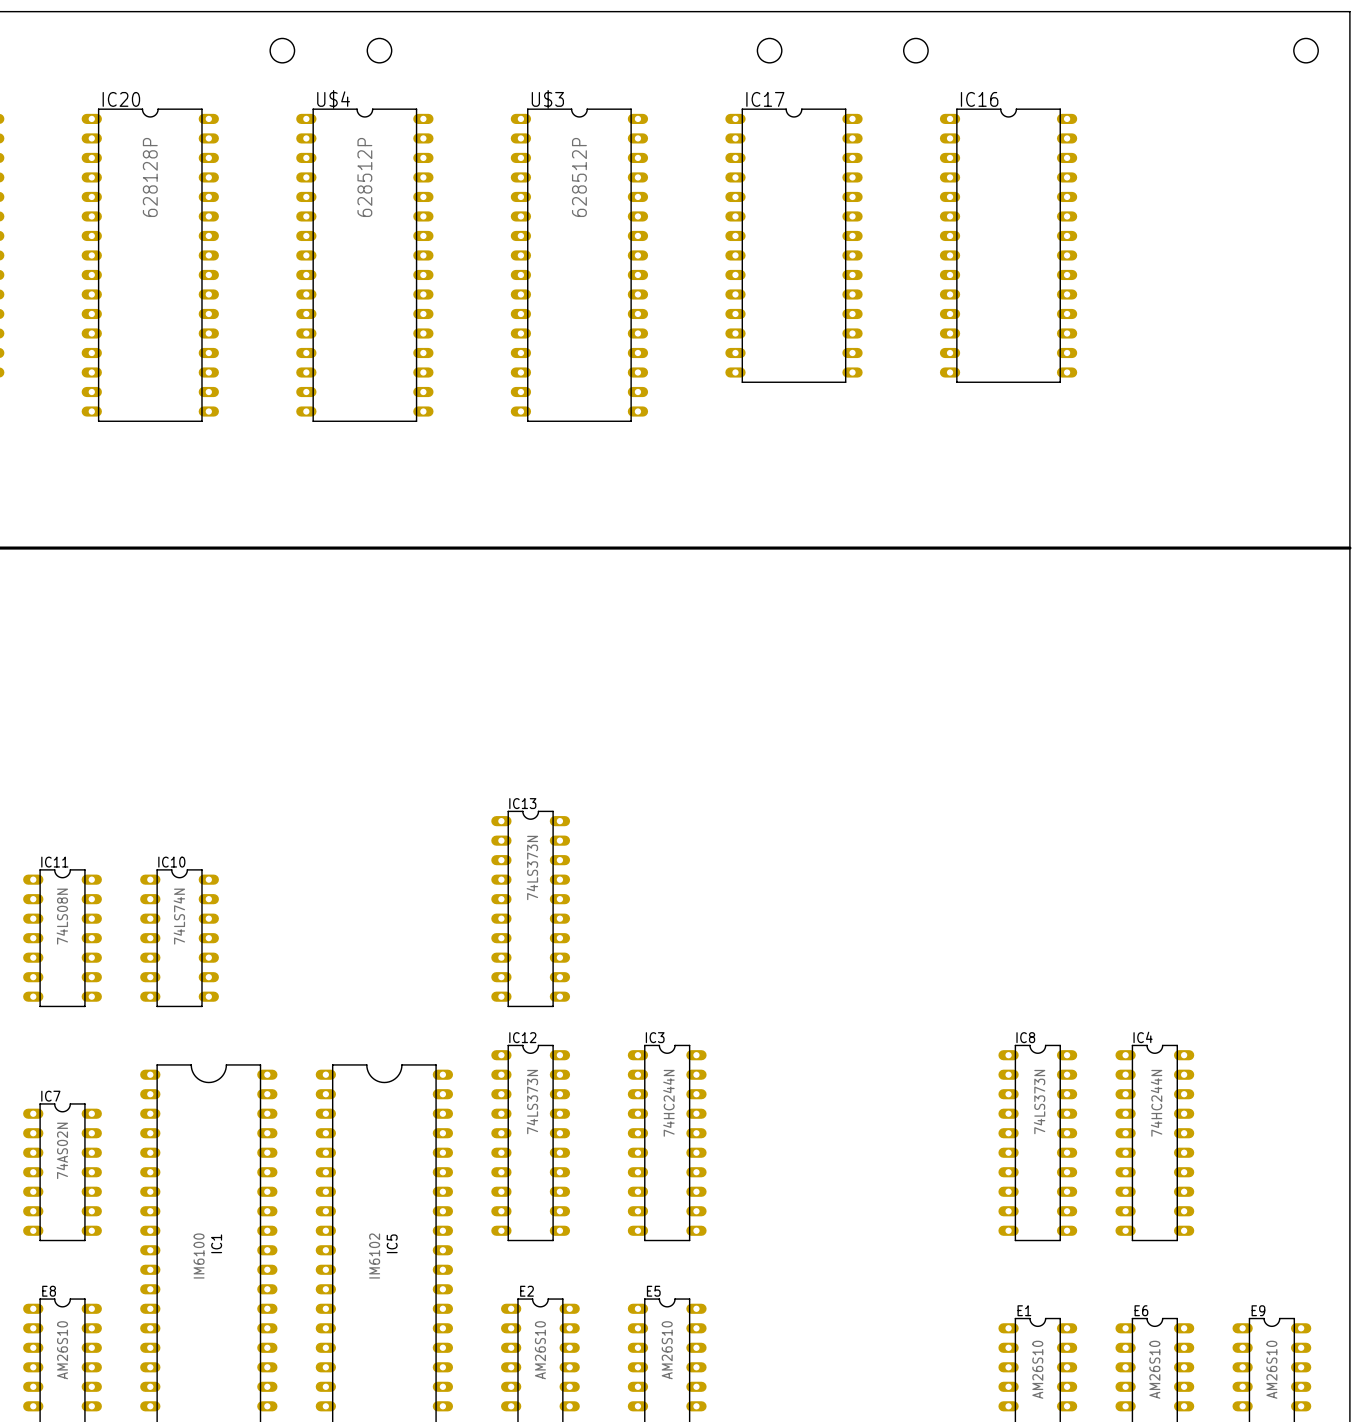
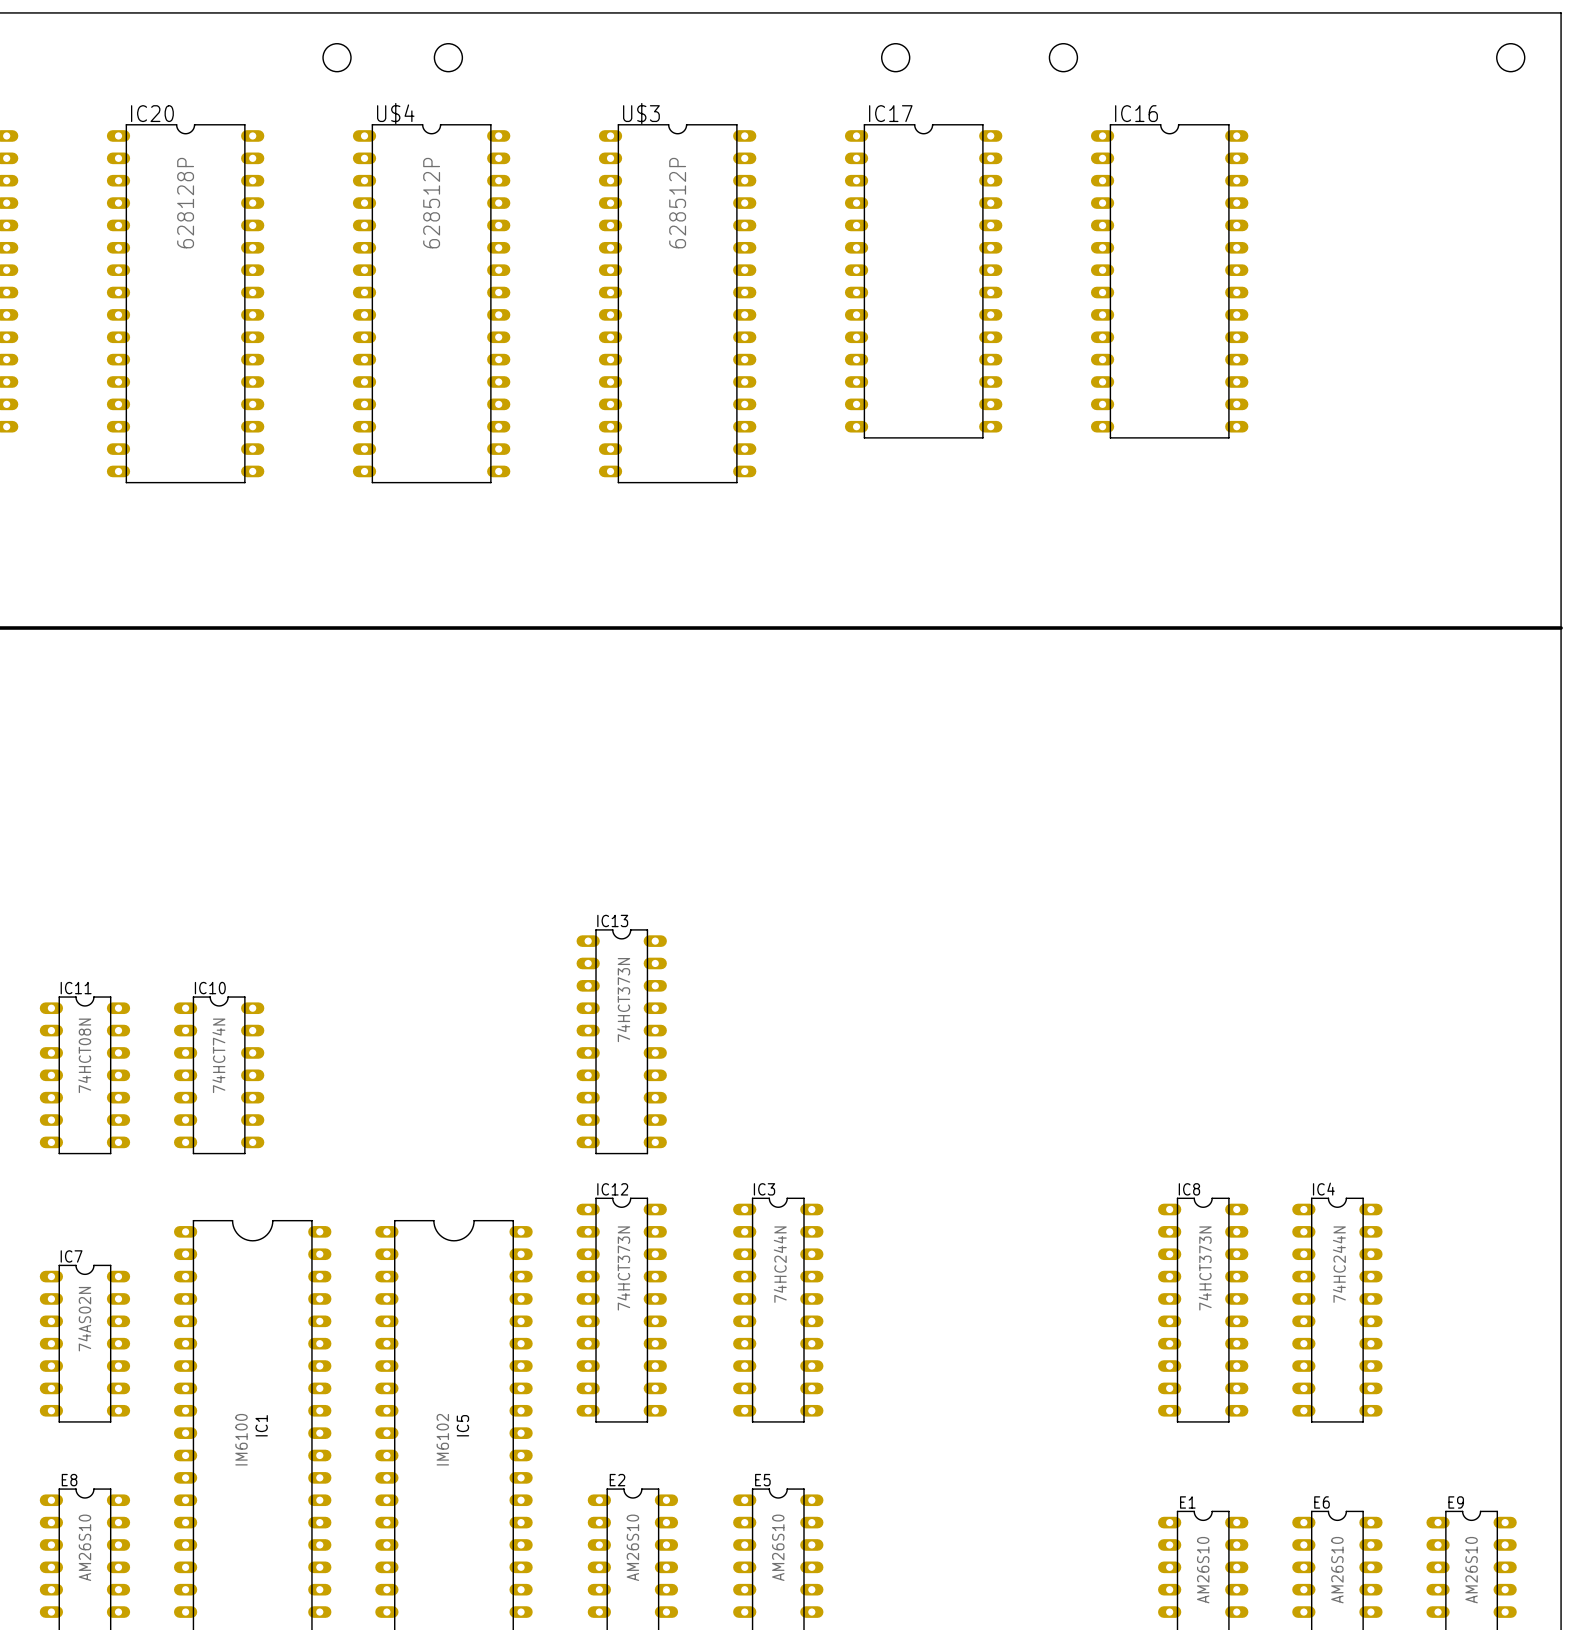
IC13 value: 74LS373N (532, 867) -> 74HCT373N (623, 1000)
IC11 value: 74LS08N (62, 916) -> 74HCT08N (84, 1055)
IC10 value: 74LS74N (179, 916) -> 74HCT74N (218, 1055)
IC12 value: 74LS373N (532, 1102) -> 74HCT373N (623, 1268)
IC8 value: 74LS373N (1039, 1102) -> 74HCT373N (1205, 1268)

